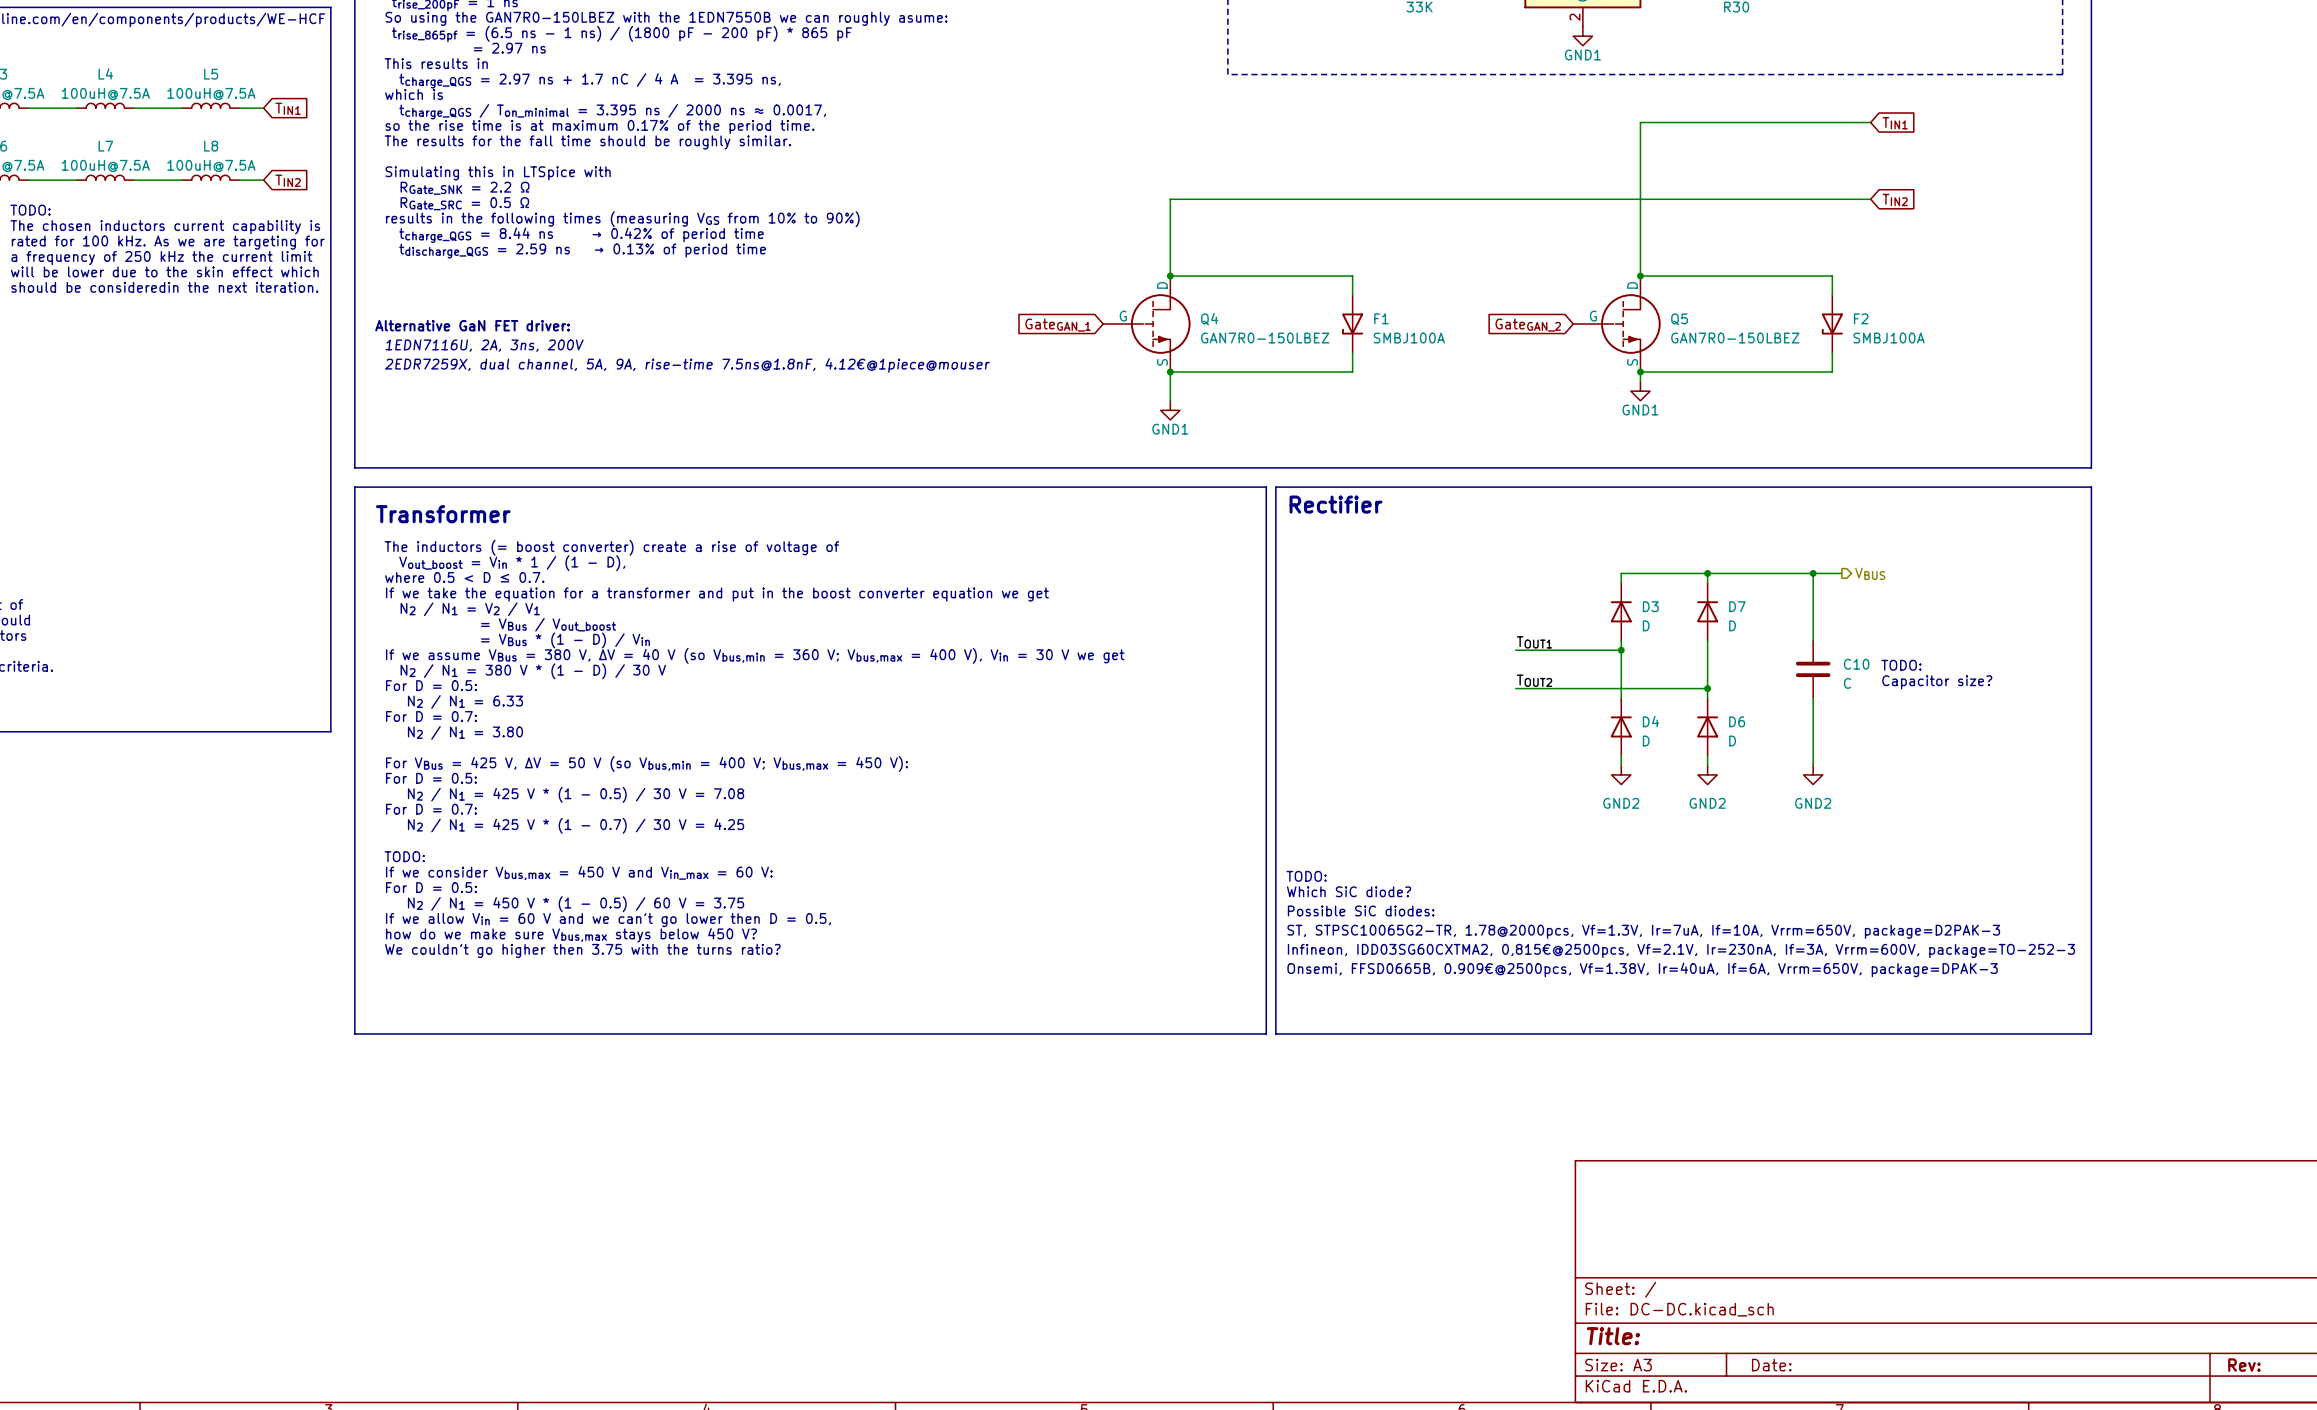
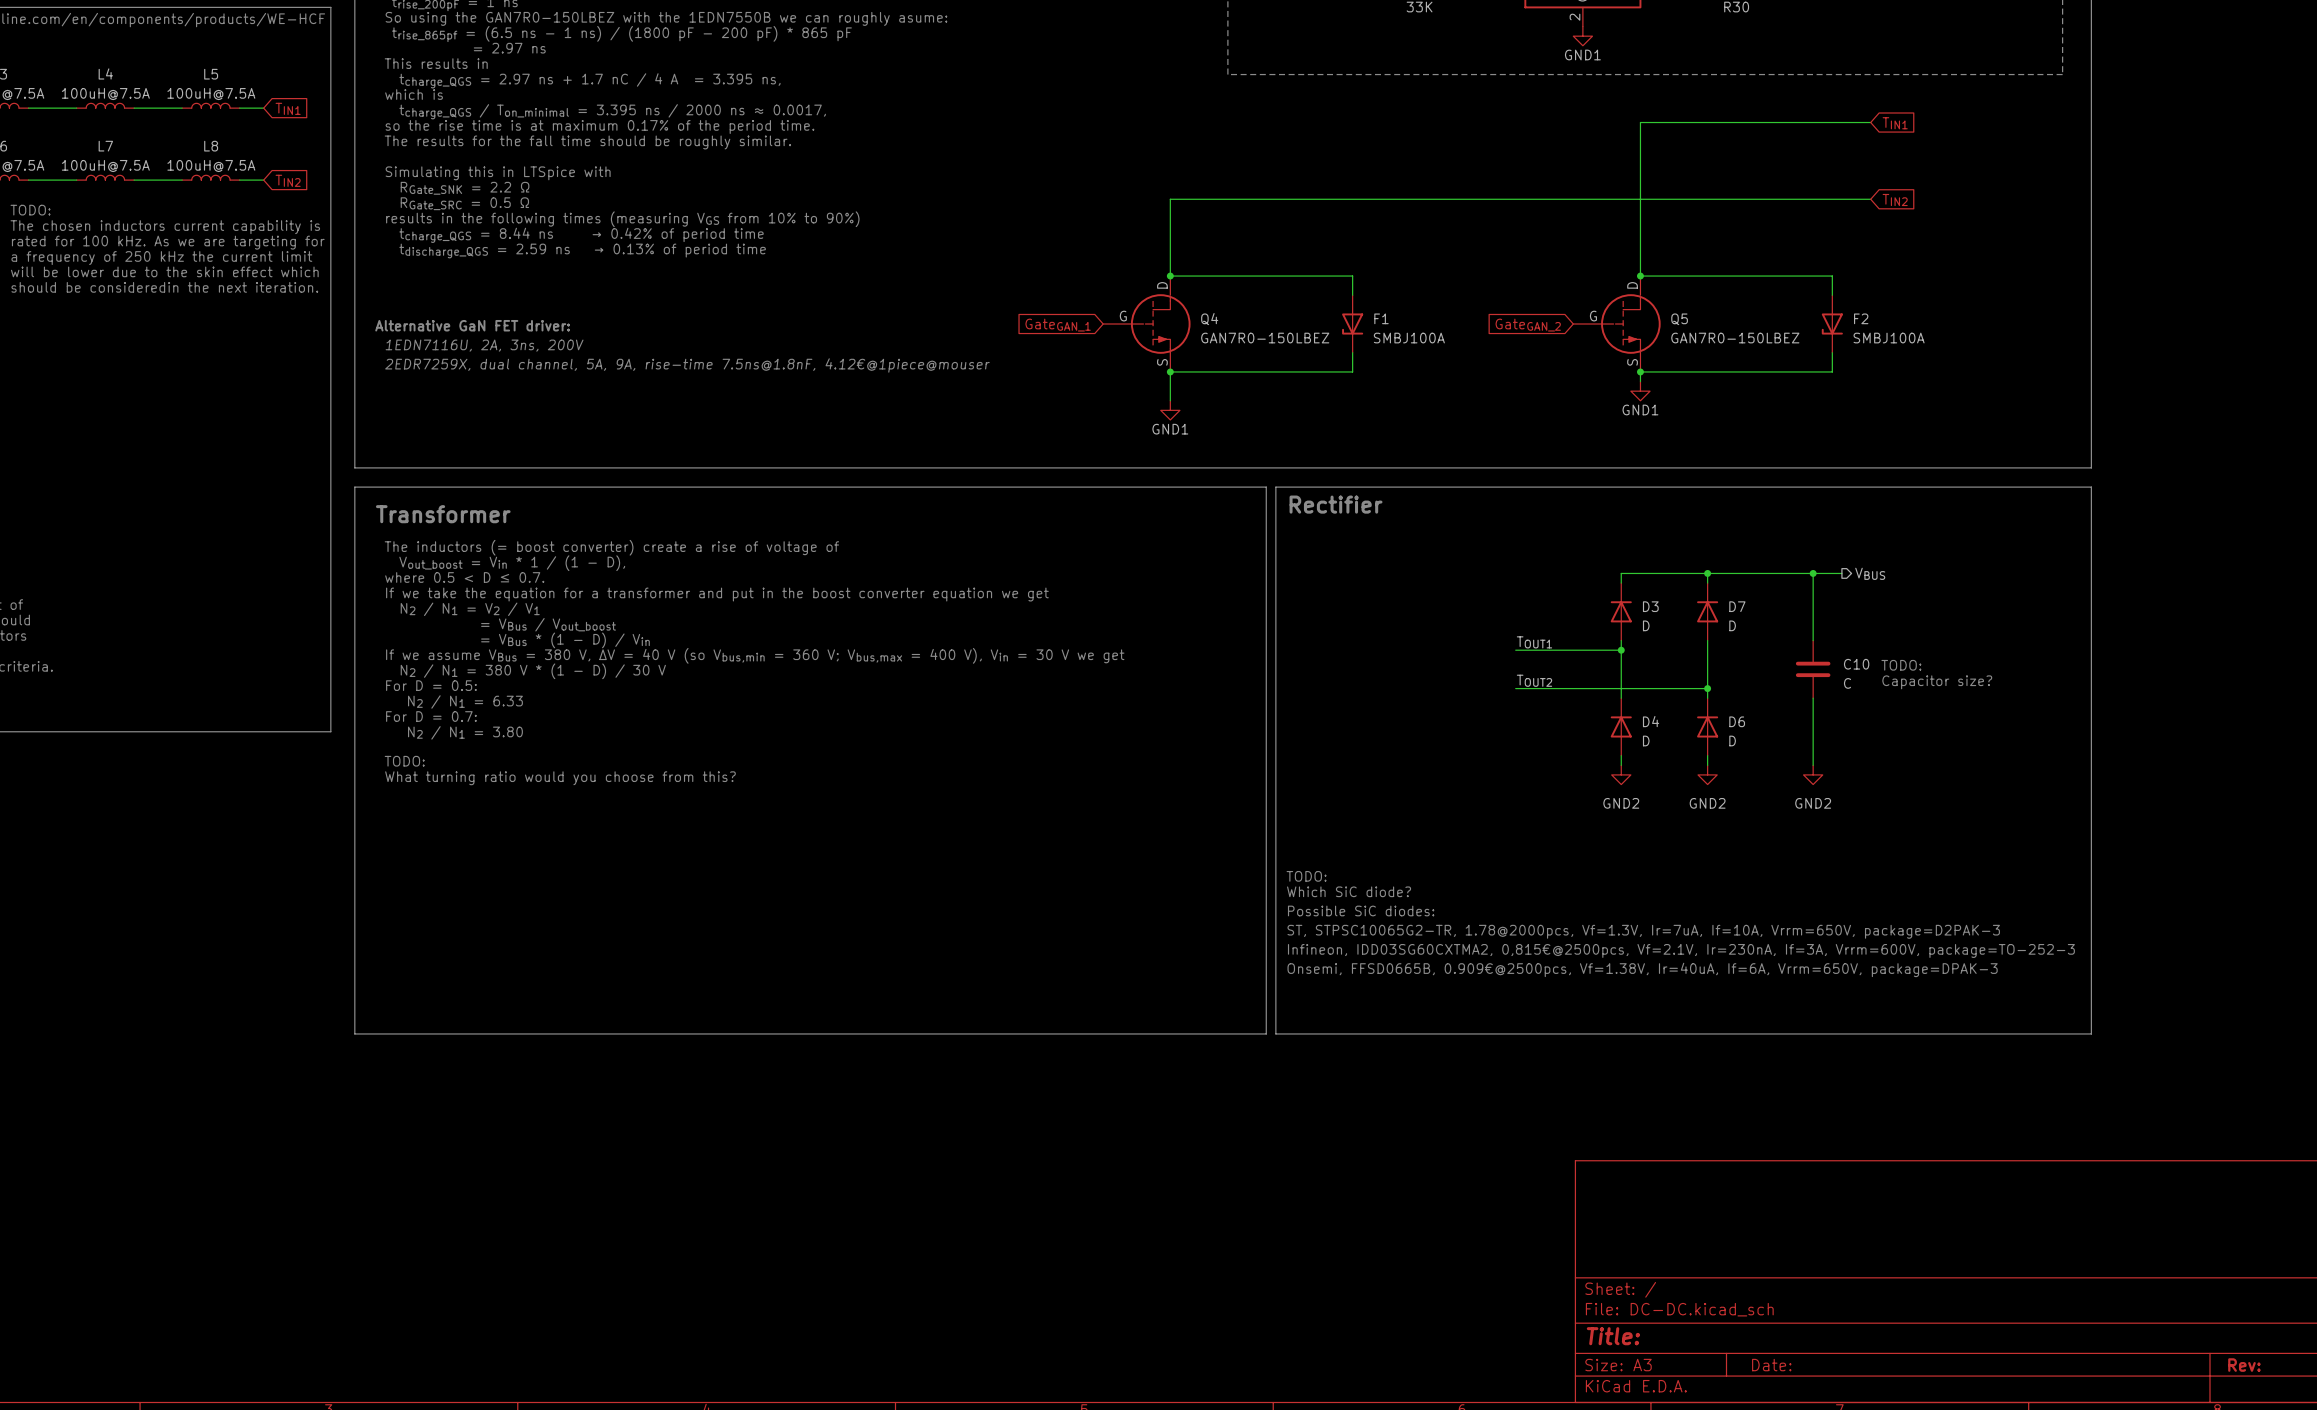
text: For VBus = 425 V, ΔV = 50 V (so Vbus,min = 400 V; Vbus,max = 450 V): (646, 763) -> none
text: For D = 0.5: (431, 778) -> What turning ratio would you choose from this? (560, 778)
text: N2 / N1 = 425 V * (1 - 0.5) / 30 V = 7.08 (576, 794) -> none
text: For D = 0.7: (431, 809) -> none
text: N2 / N1 = 425 V * (1 - 0.7) / 30 V = 4.25 (576, 825) -> none
text position: TODO: (404, 856) -> TODO: (404, 761)
text: If we consider Vbus,max = 450 V and Vin_max = 60 V: (579, 873) -> none
text: For D = 0.5: (431, 887) -> none
text: N2 / N1 = 450 V * (1 - 0.5) / 60 V = 3.75 (576, 904) -> none
text: If we allow Vin = 60 V and we can't go lower then D = 0.5, (608, 920) -> none
text: how do we make sure Vbus,max stays below 450 V? (571, 935) -> none
text: We couldn't go higher then 3.75 with the turns ratio? (582, 950) -> none

